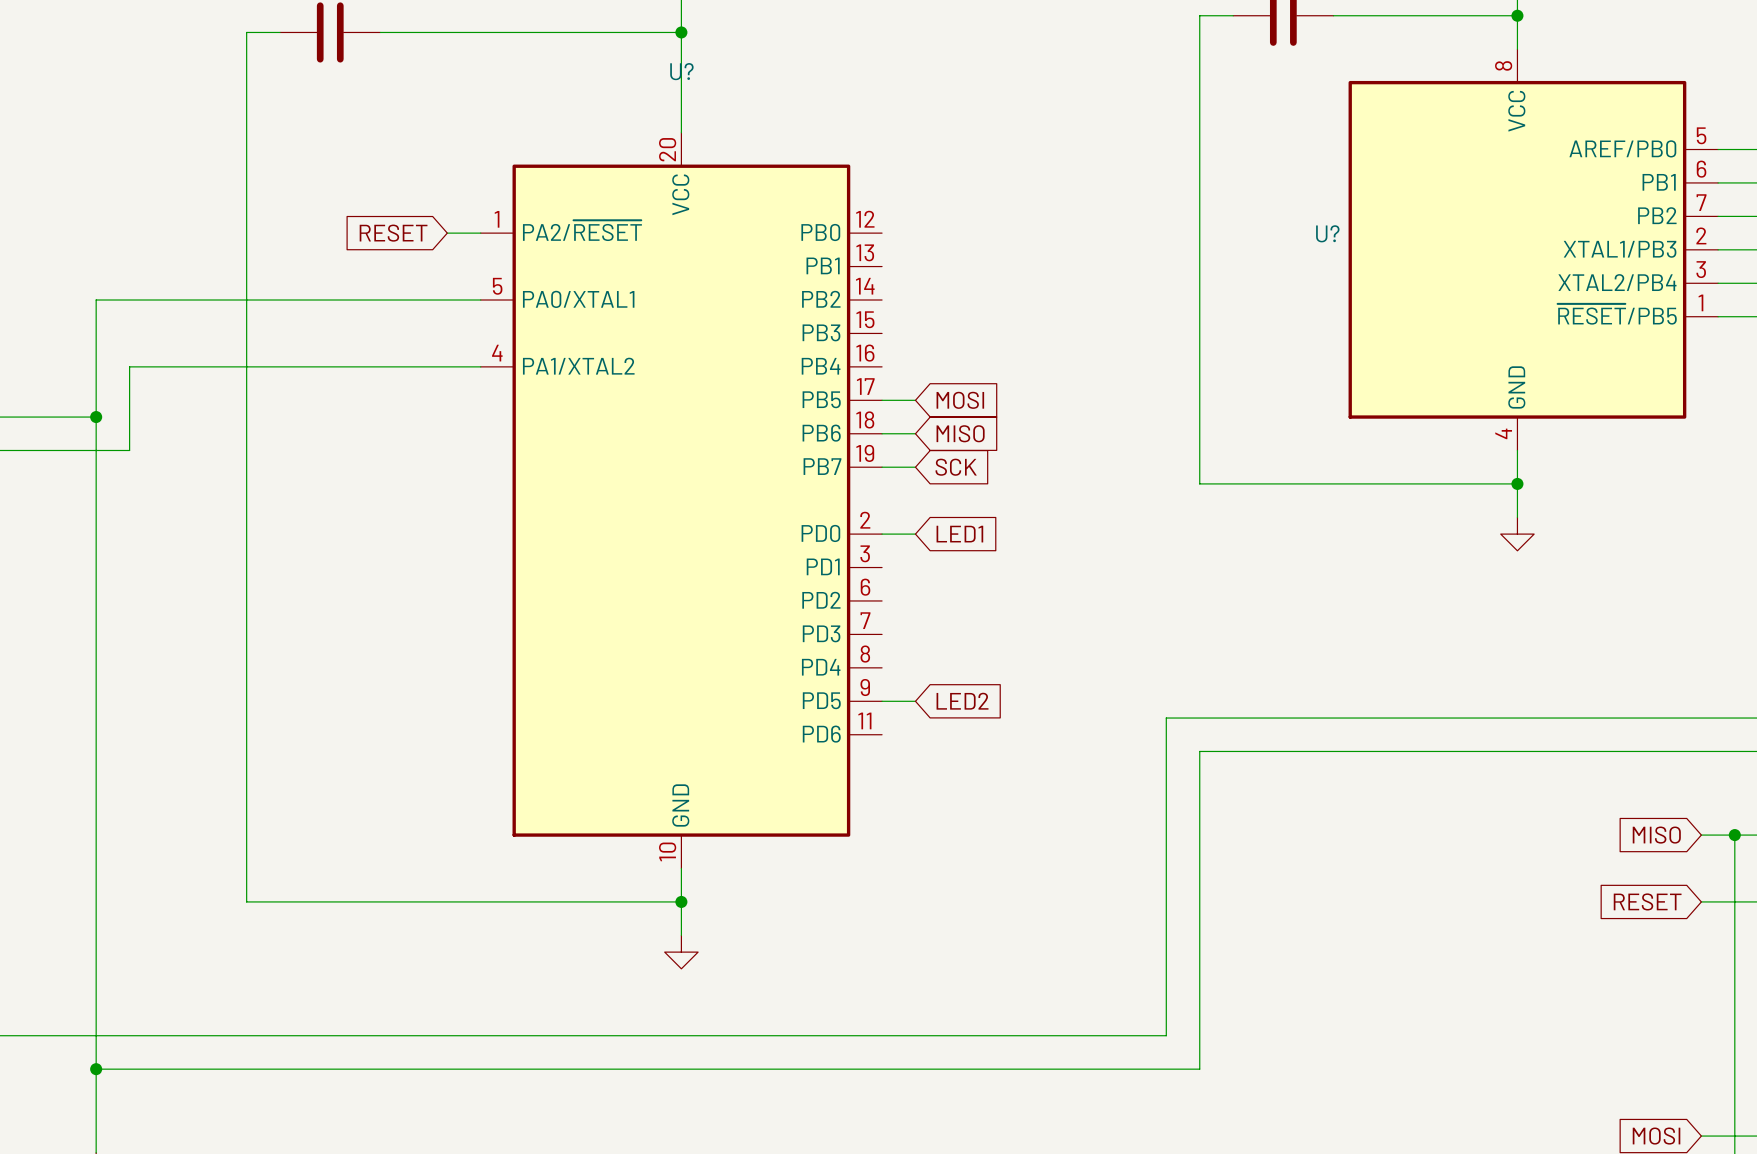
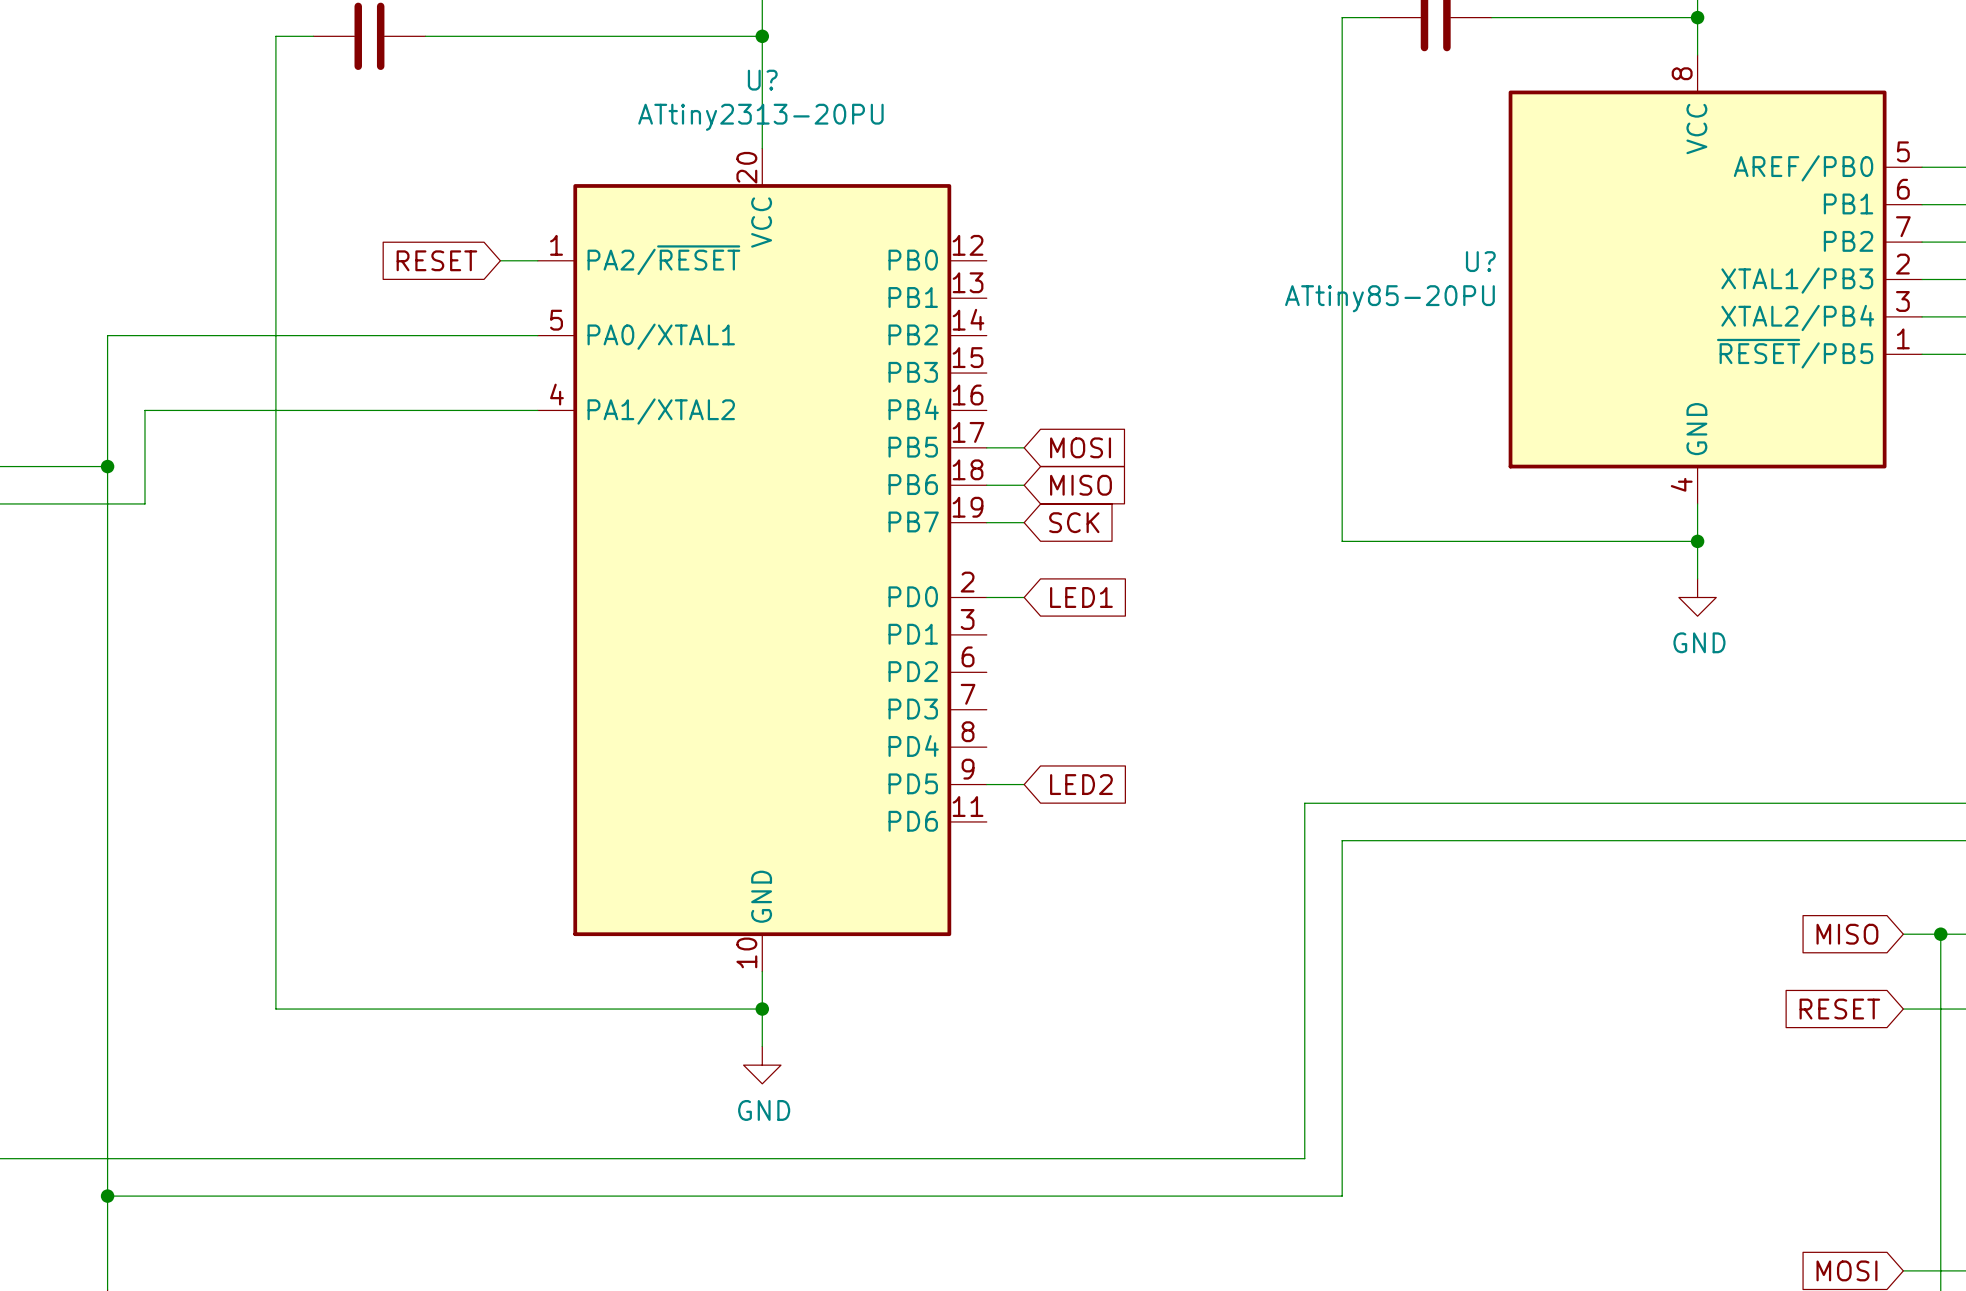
U? value: none -> ATtiny2313-20PU (760, 117)
U? value: none -> ATtiny85-20PU (1389, 298)
power symbol text: none -> GND (1699, 642)
power symbol text: none -> GND (764, 1110)

